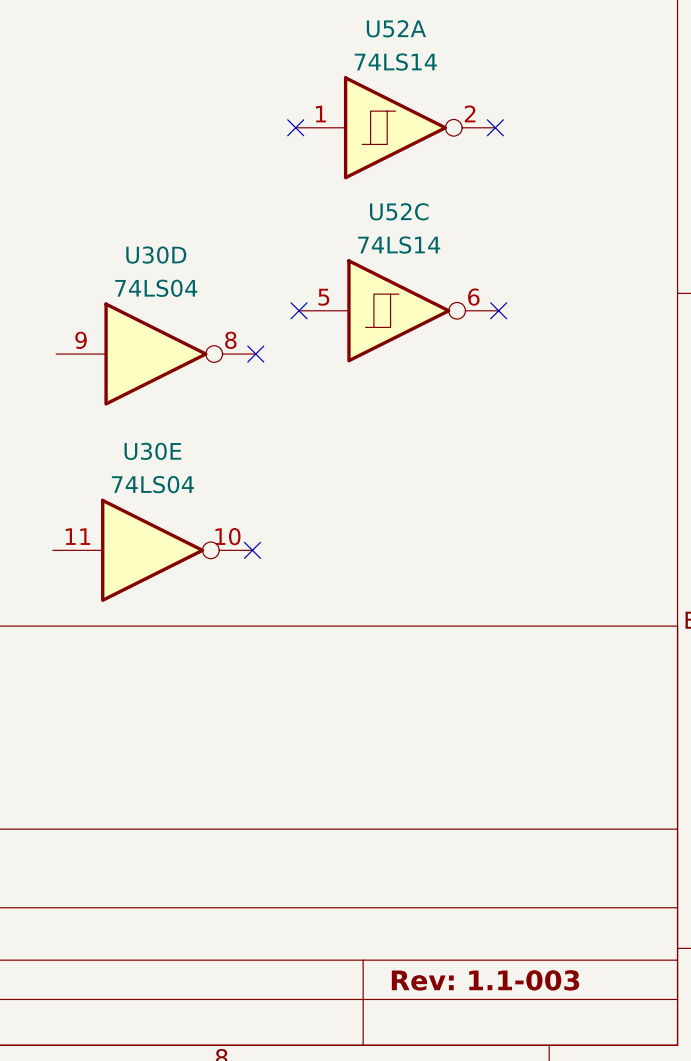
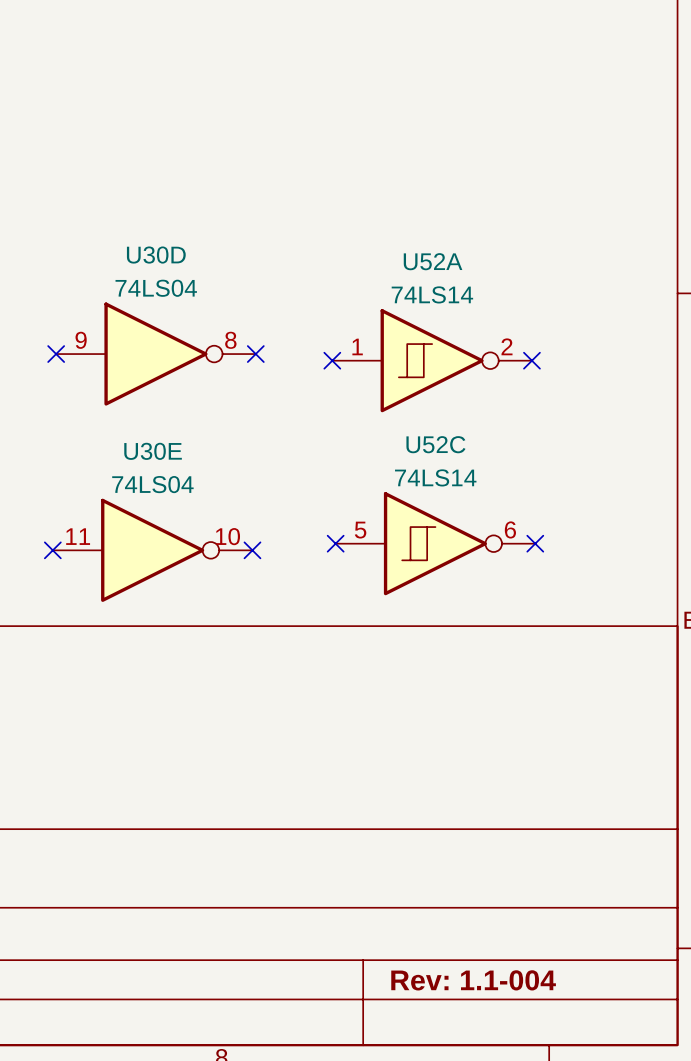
no-connect mark: (295, 127) -> none
U52A position: (395, 127) -> (432, 360)
no-connect mark: (495, 127) -> none
no-connect mark position: (299, 310) -> (332, 360)
U52C position: (398, 310) -> (435, 543)
no-connect mark position: (498, 310) -> (531, 360)
no-connect mark: none -> (56, 354)
no-connect mark: none -> (335, 543)
no-connect mark: none -> (535, 543)
no-connect mark: none -> (52, 550)
title block: Rev: 1.1-003 (485, 980) -> Rev: 1.1-004 (473, 980)

